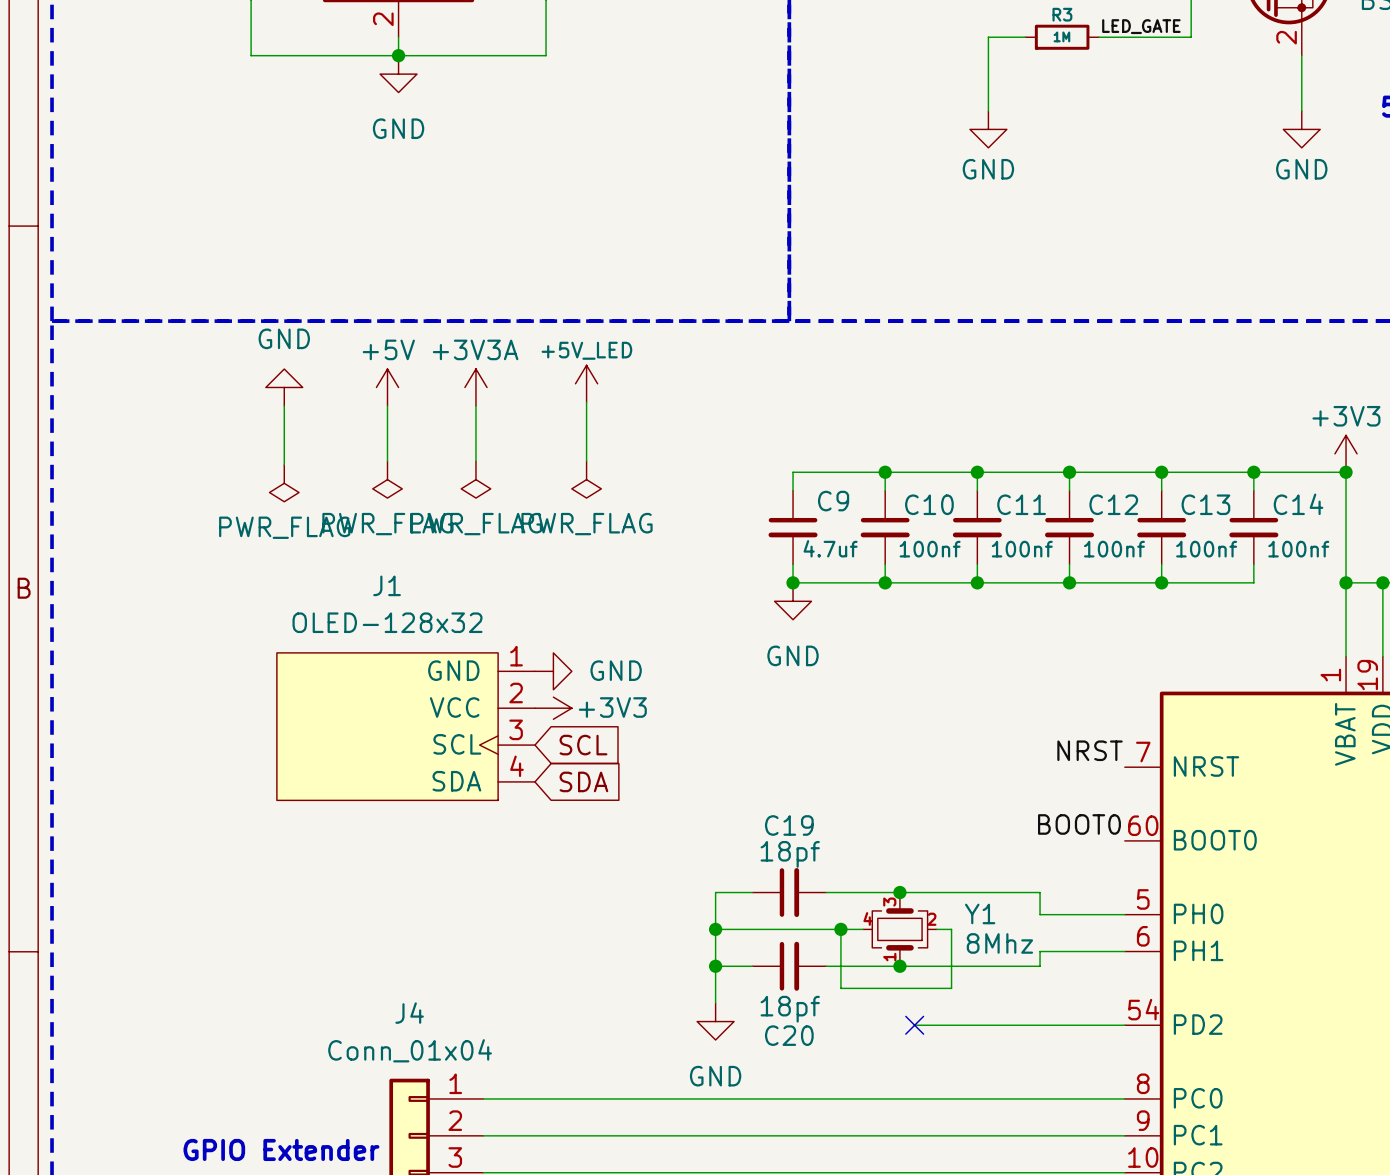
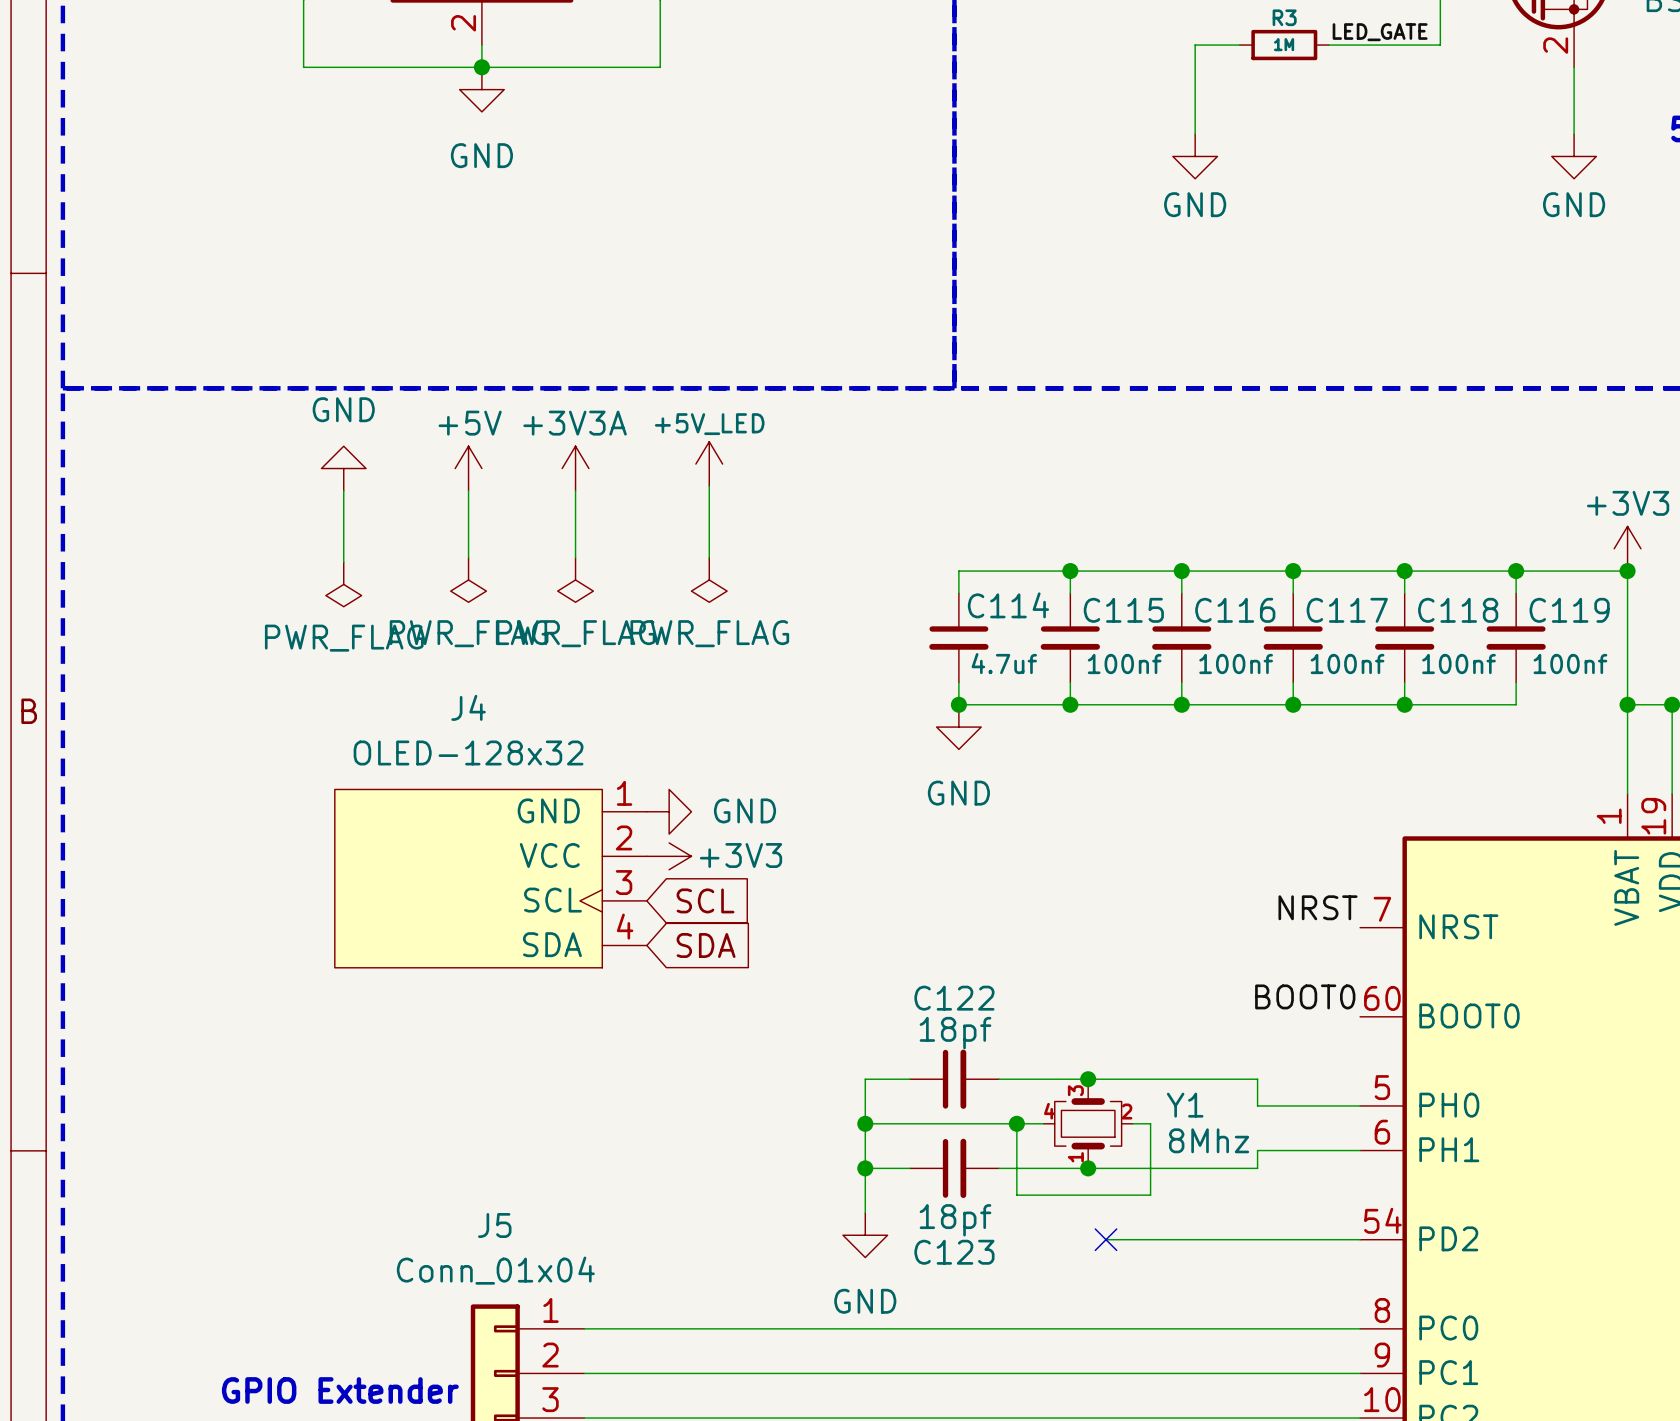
C9 name: C9 (833, 501) -> C114 (1008, 605)
C10 name: C10 (929, 504) -> C115 (1123, 610)
C11 name: C11 (1021, 504) -> C116 (1235, 610)
C12 name: C12 (1113, 504) -> C117 (1347, 610)
C13 name: C13 (1205, 504) -> C118 (1458, 610)
C14 name: C14 (1298, 504) -> C119 (1569, 610)
J1 name: J1 (387, 585) -> J4 (468, 707)
C19 name: C19 (789, 825) -> C122 (954, 998)
J4 name: J4 (409, 1013) -> J5 (494, 1225)
C20 name: C20 (789, 1035) -> C123 (954, 1252)

